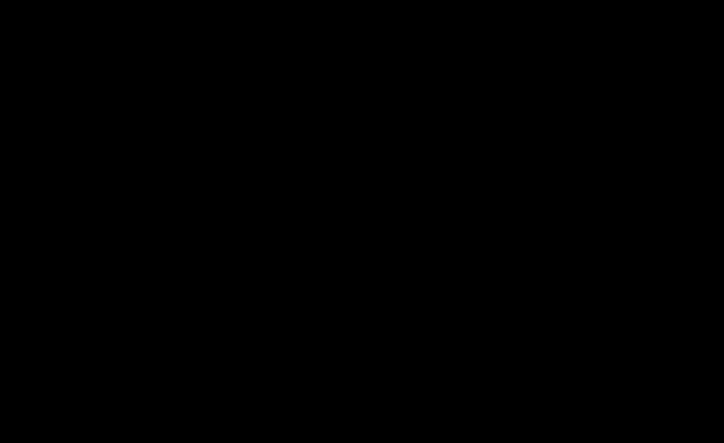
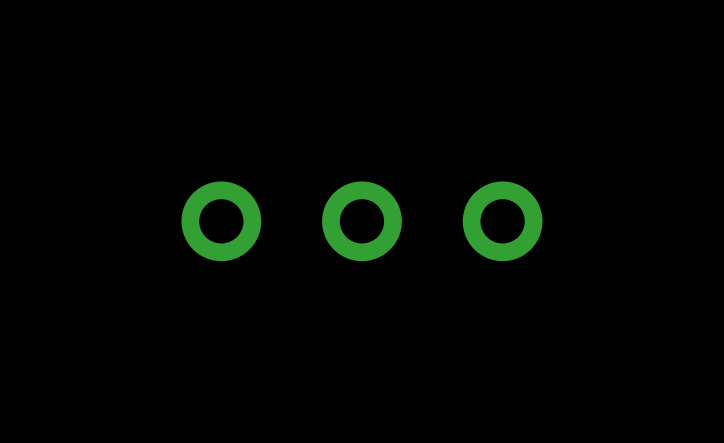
part: none -> (361, 221)

